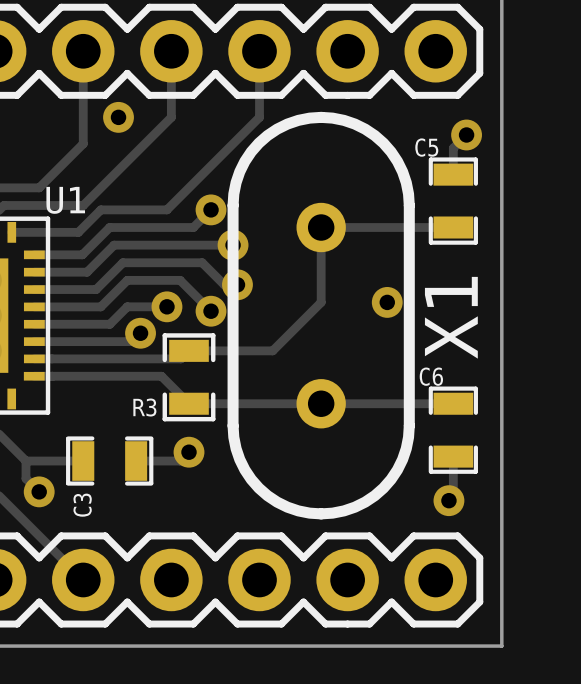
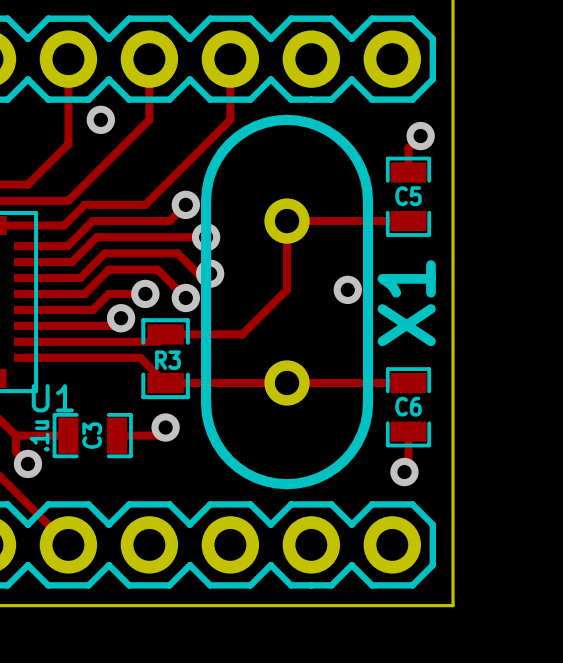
C5 name position: C5 (426, 147) -> C5 (408, 196)
U1 name position: U1 (65, 200) -> U1 (52, 398)
C6 name position: C6 (431, 376) -> C6 (408, 406)
R3 name position: R3 (144, 407) -> R3 (167, 360)
C3 value: none -> .1u (39, 435)
C3 name position: C3 (82, 505) -> C3 (92, 435)

